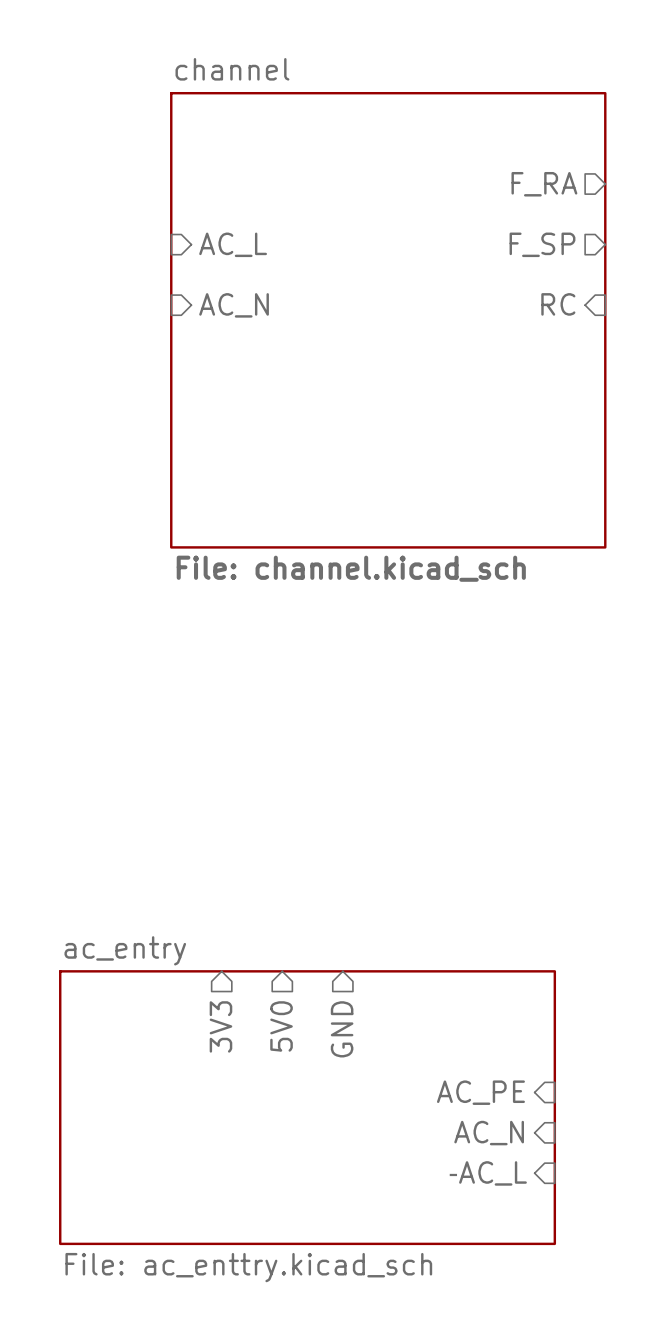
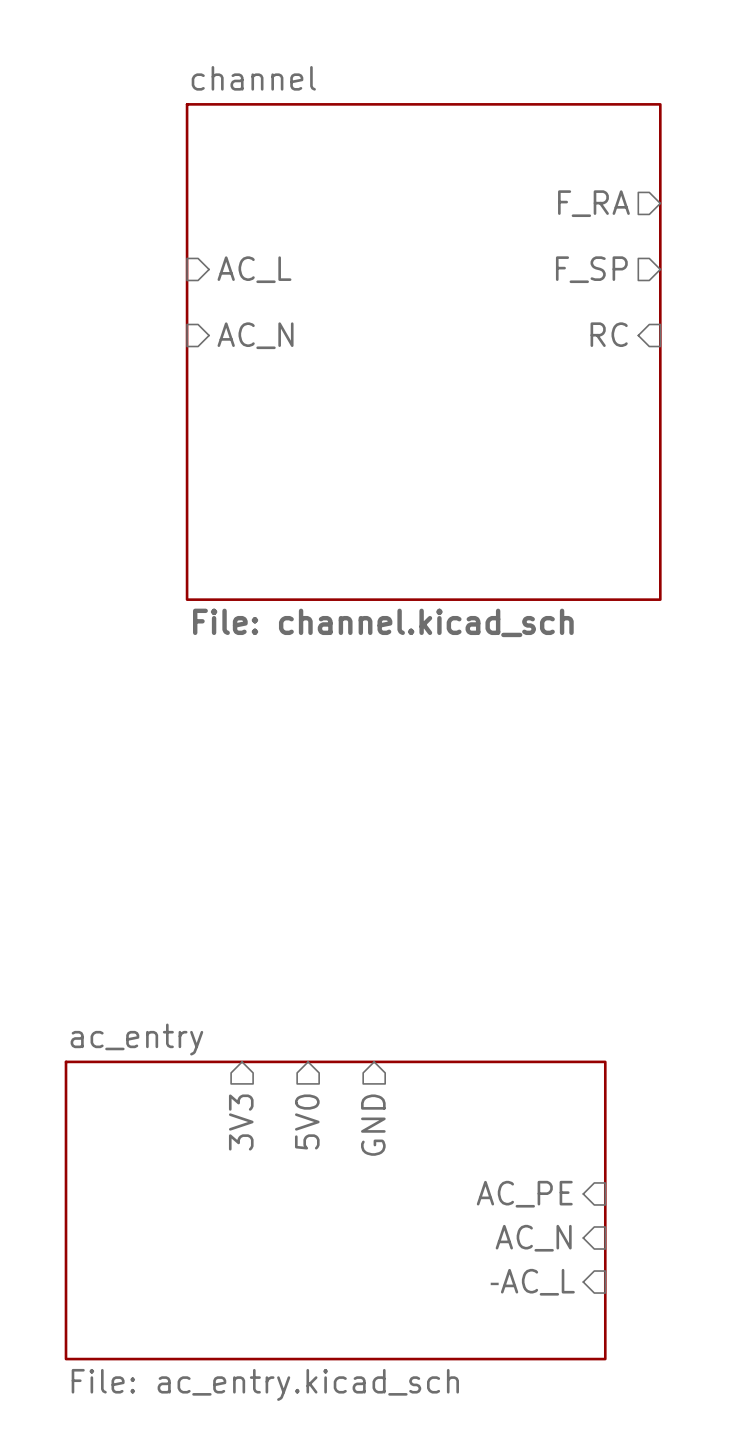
sheet ac_entry value: File: ac_enttry.kicad_sch (248, 1267) -> File: ac_entry.kicad_sch (265, 1384)

